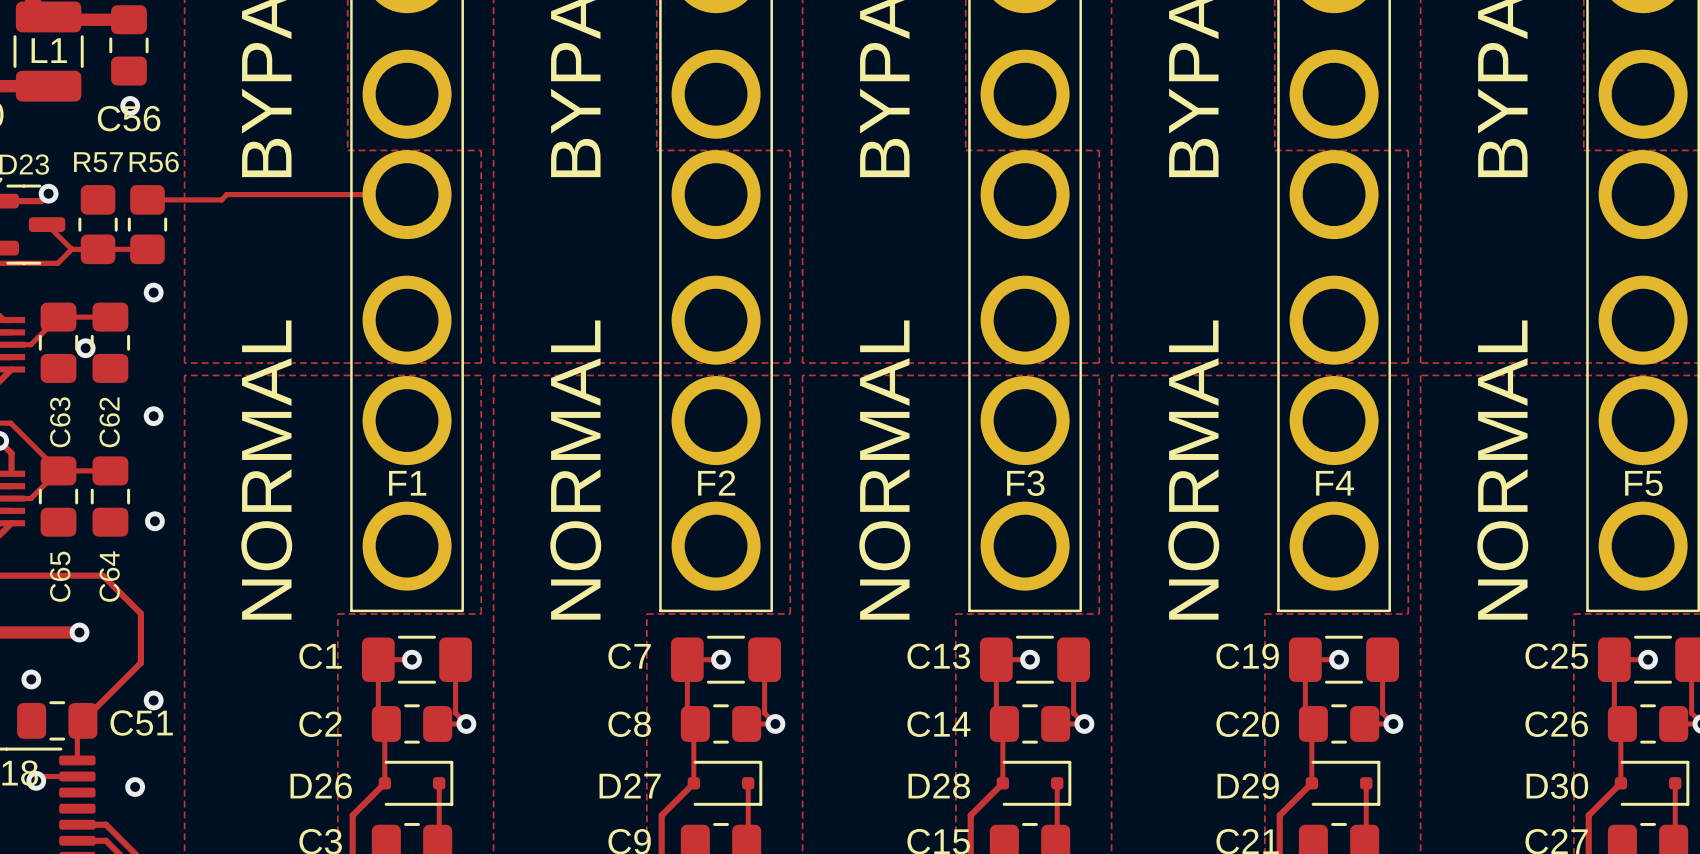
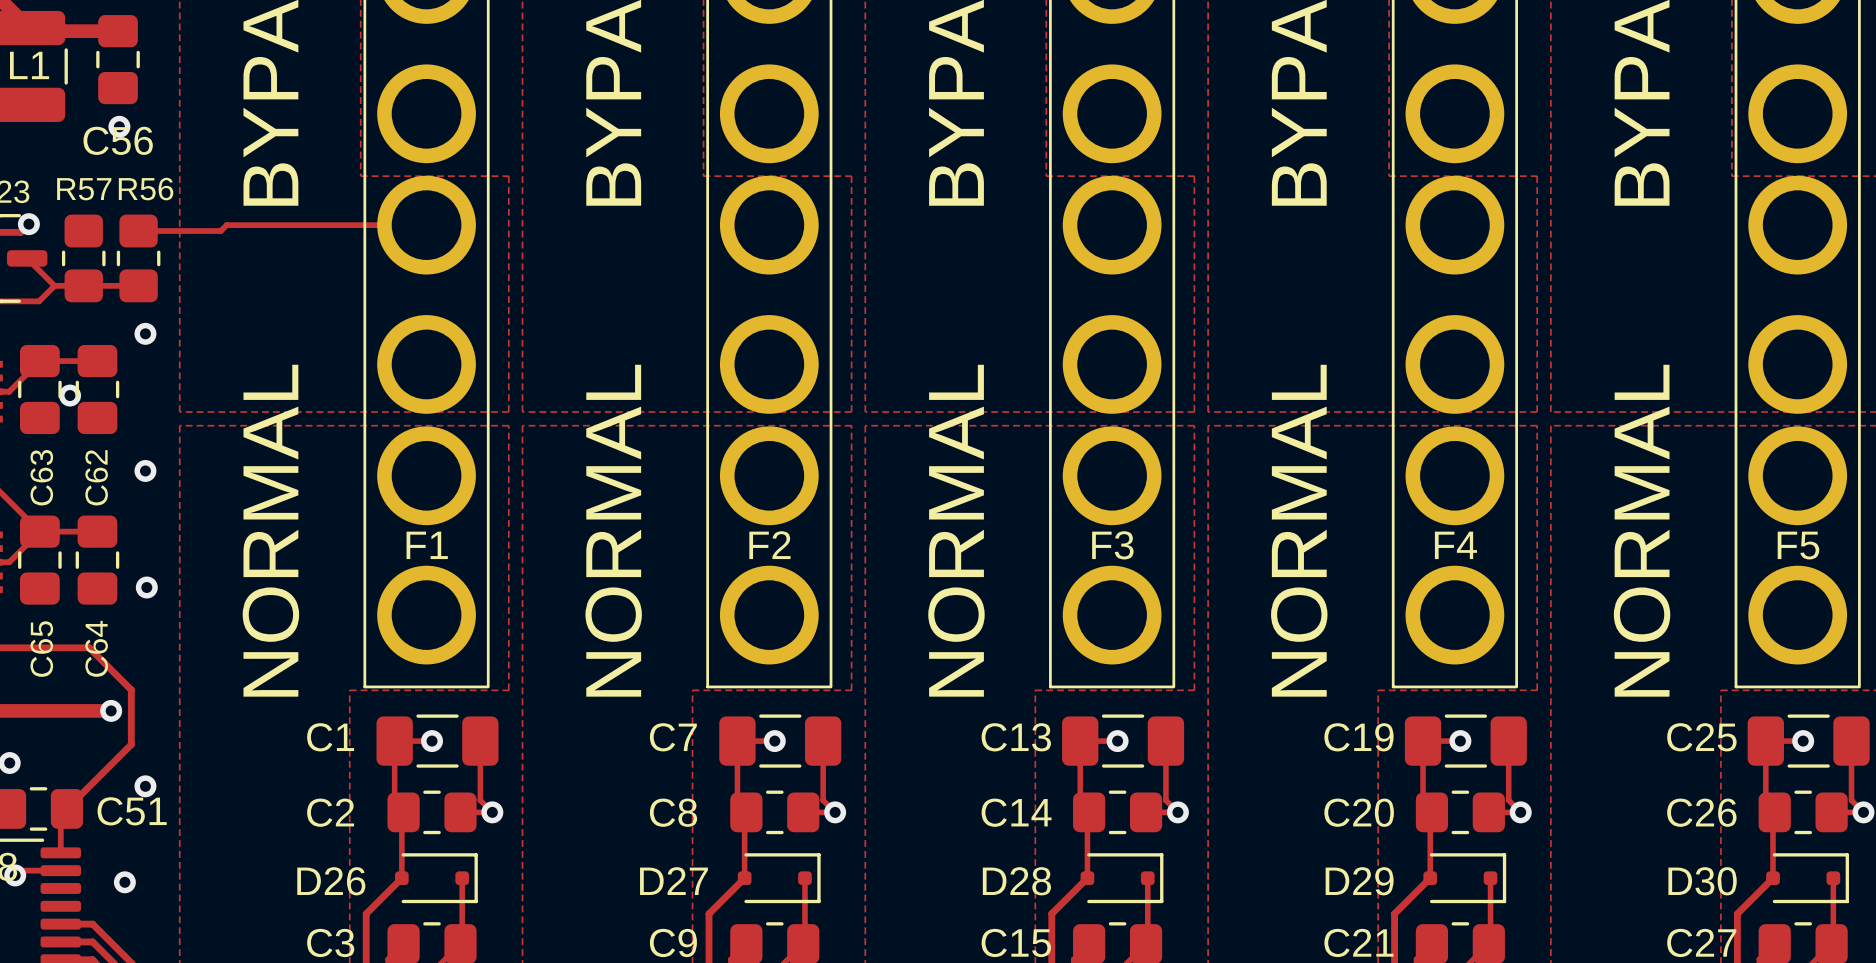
track: none -> (63, 710) (111, 710)
via position: (79, 632) -> (111, 710)

